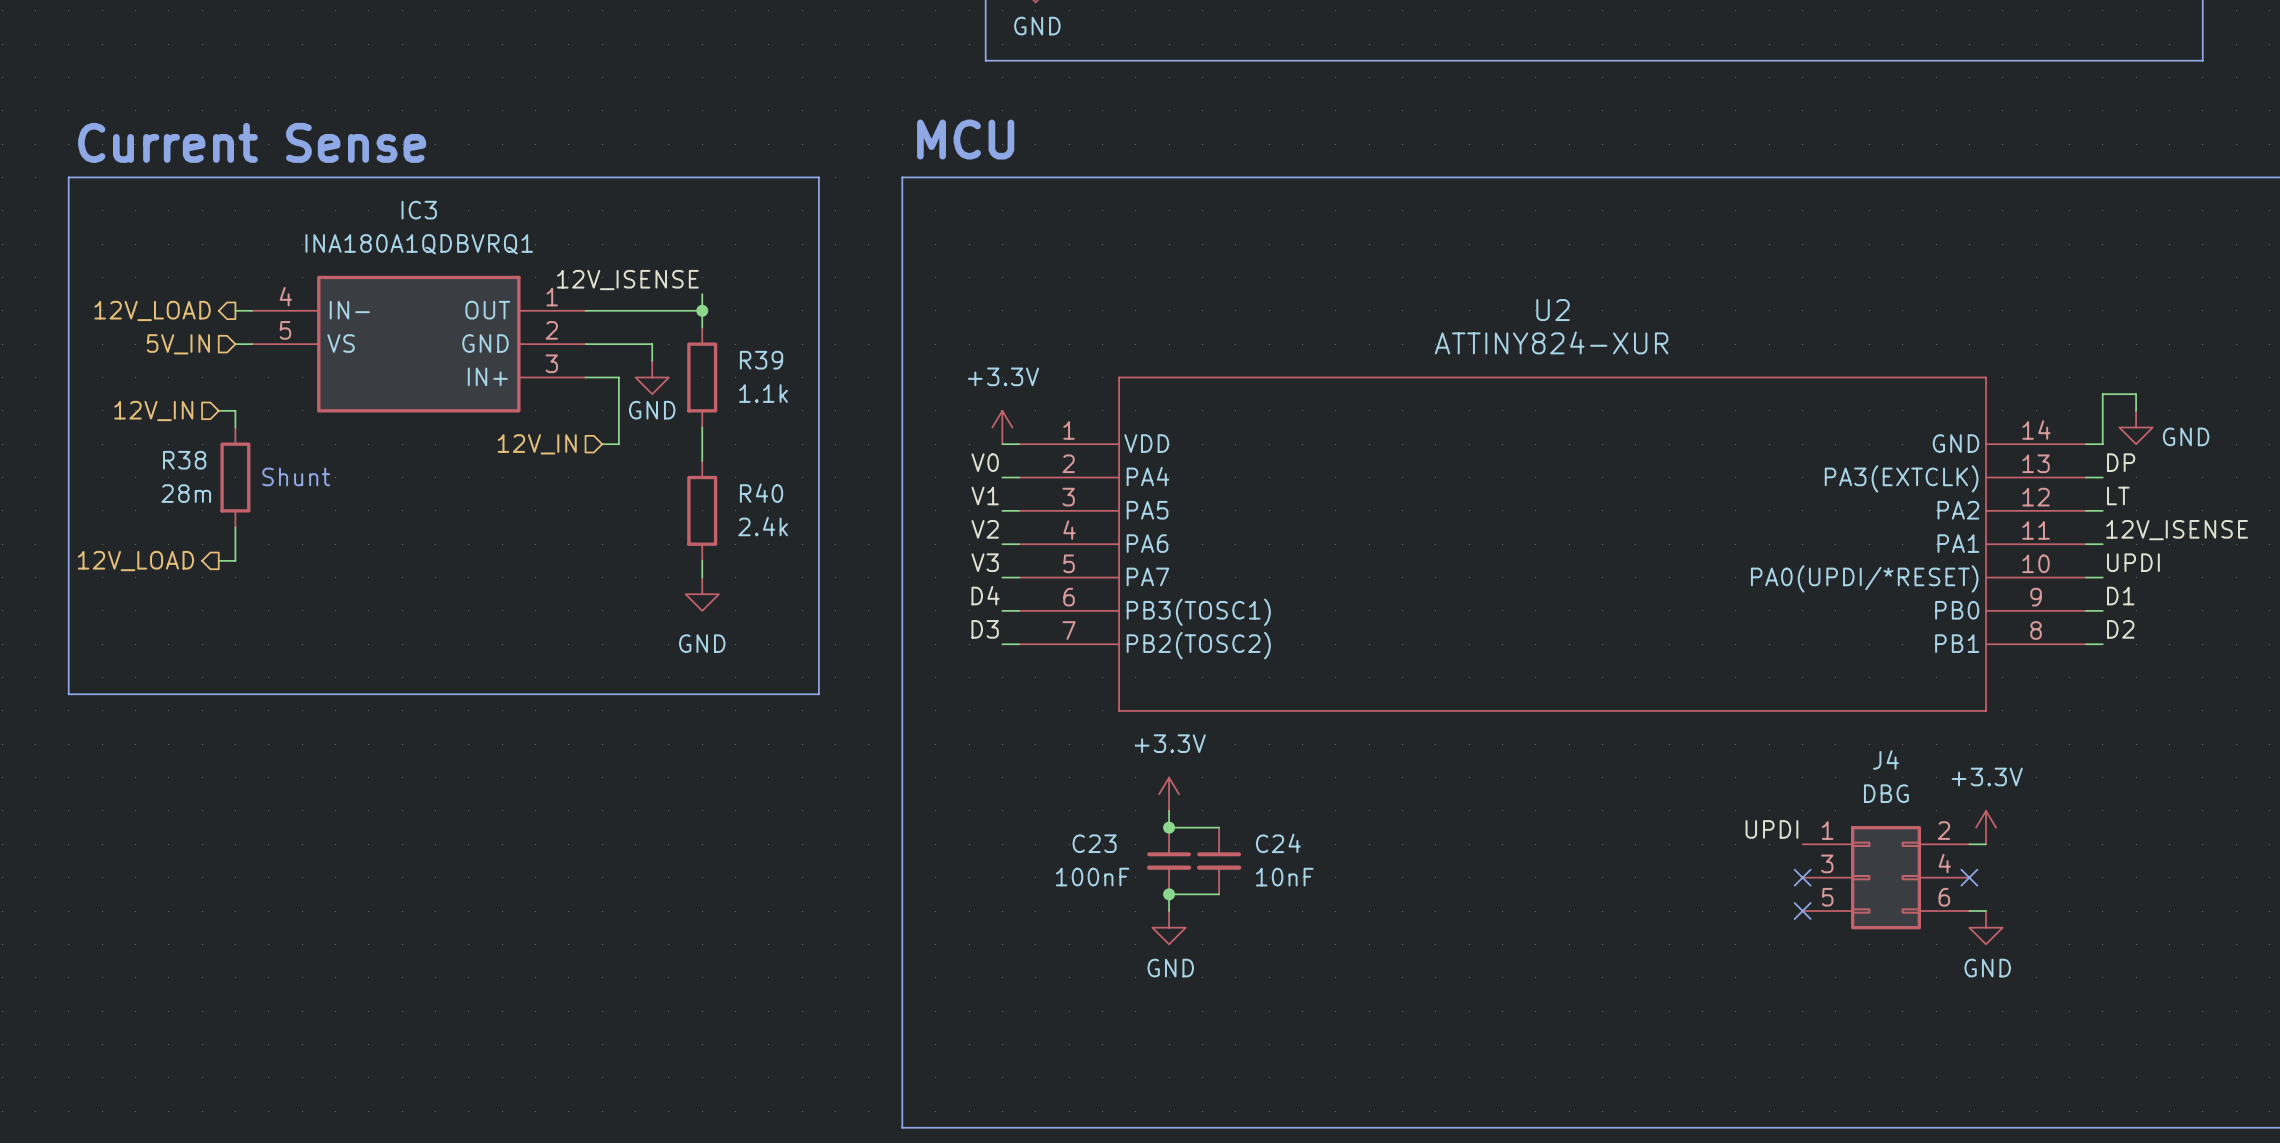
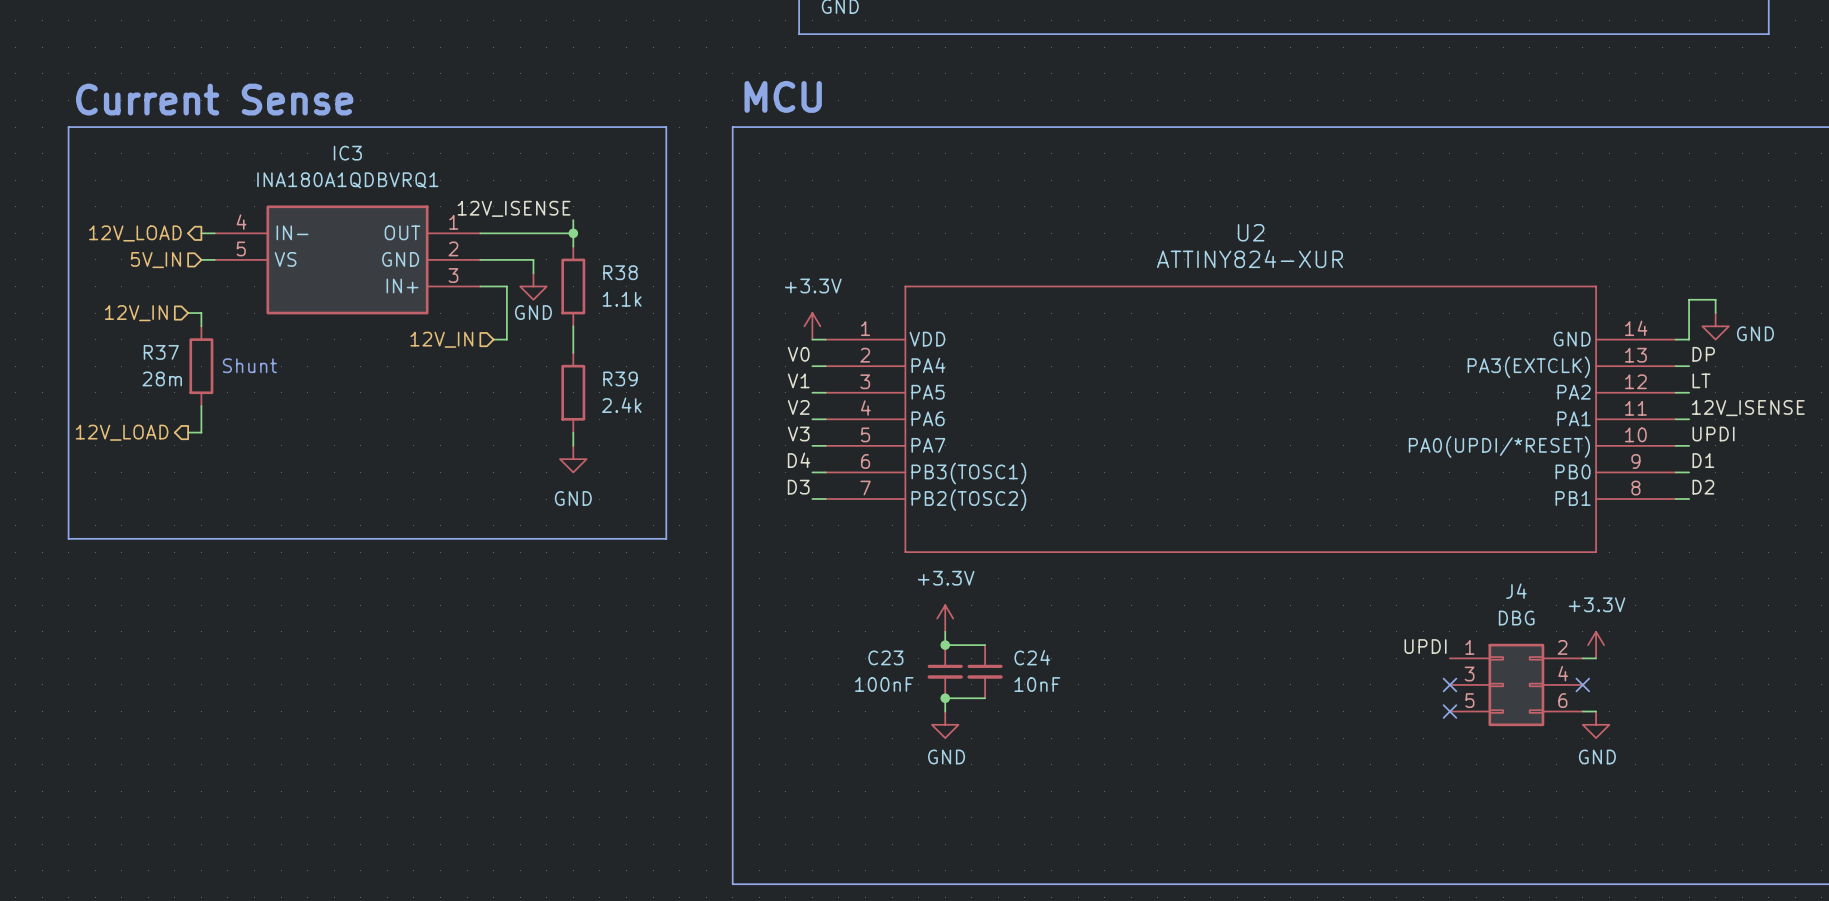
R39 name: R39 (761, 360) -> R38 (620, 272)
R38 name: R38 (184, 460) -> R37 (161, 352)
R40 name: R40 (761, 493) -> R39 (620, 378)

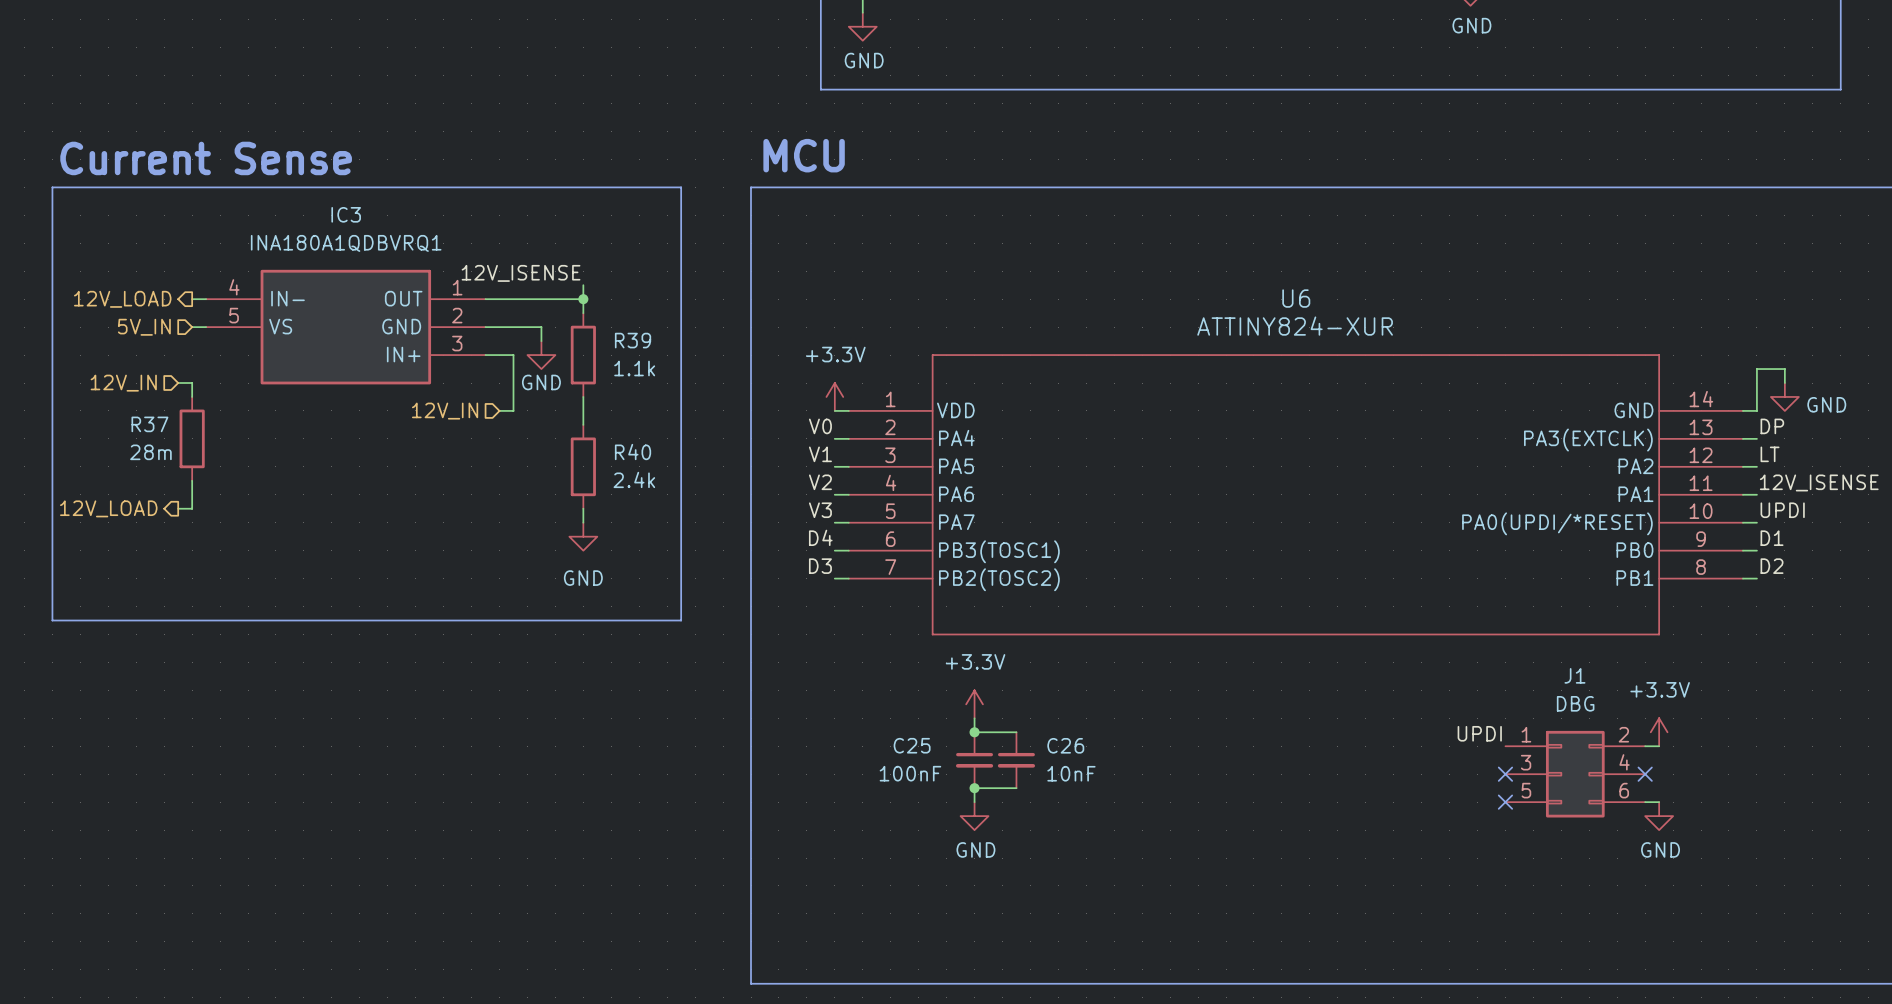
U2 name: U2 (1251, 232) -> U6 (1296, 298)
R38 name: R38 (620, 272) -> R39 (633, 340)
text: Shunt (249, 365) -> none
R39 name: R39 (620, 378) -> R40 (633, 452)
J4 name: J4 (1516, 591) -> J1 (1574, 675)
C23 name: C23 (885, 657) -> C25 (912, 745)
C24 name: C24 (1032, 657) -> C26 (1065, 745)

